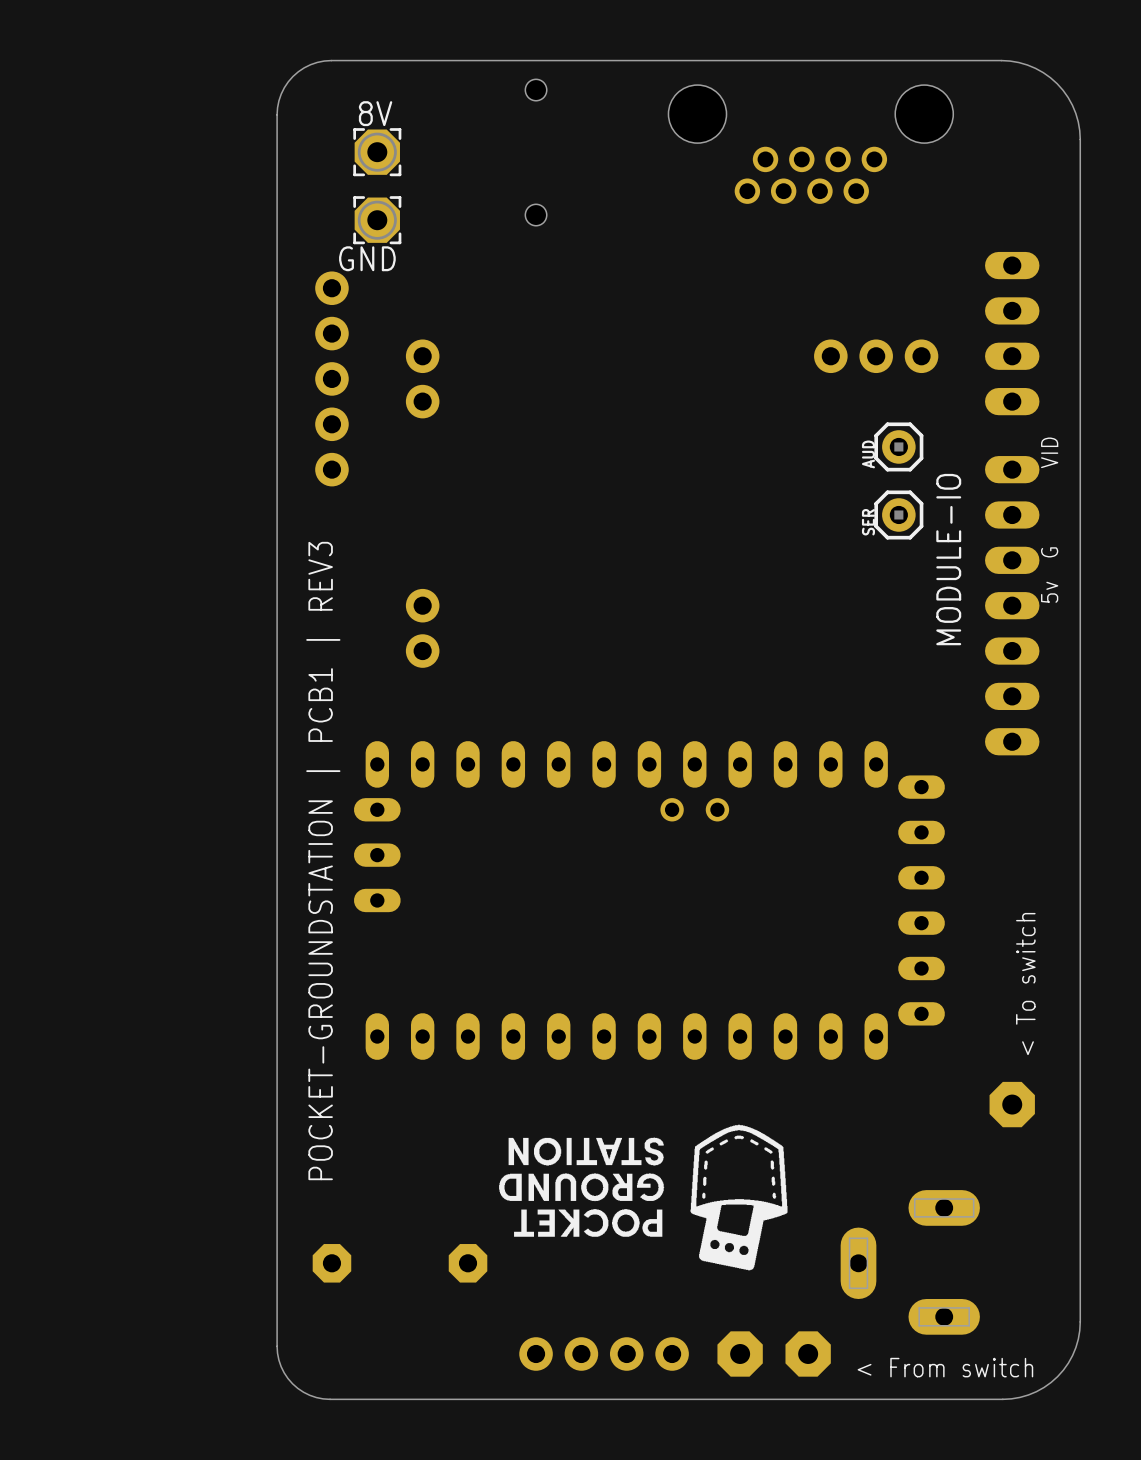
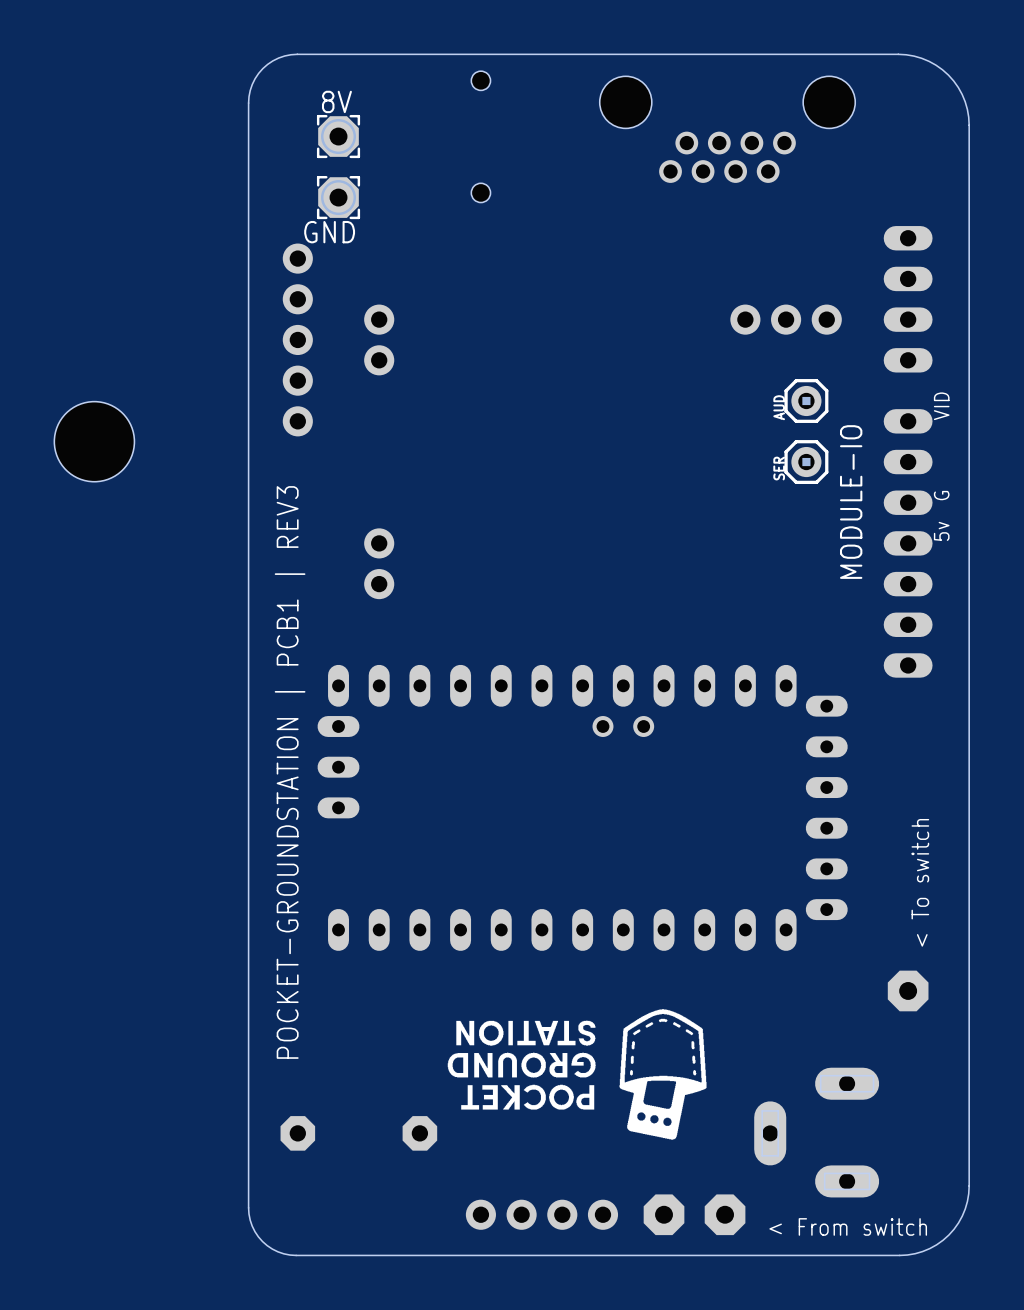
part: none -> (94, 441)

